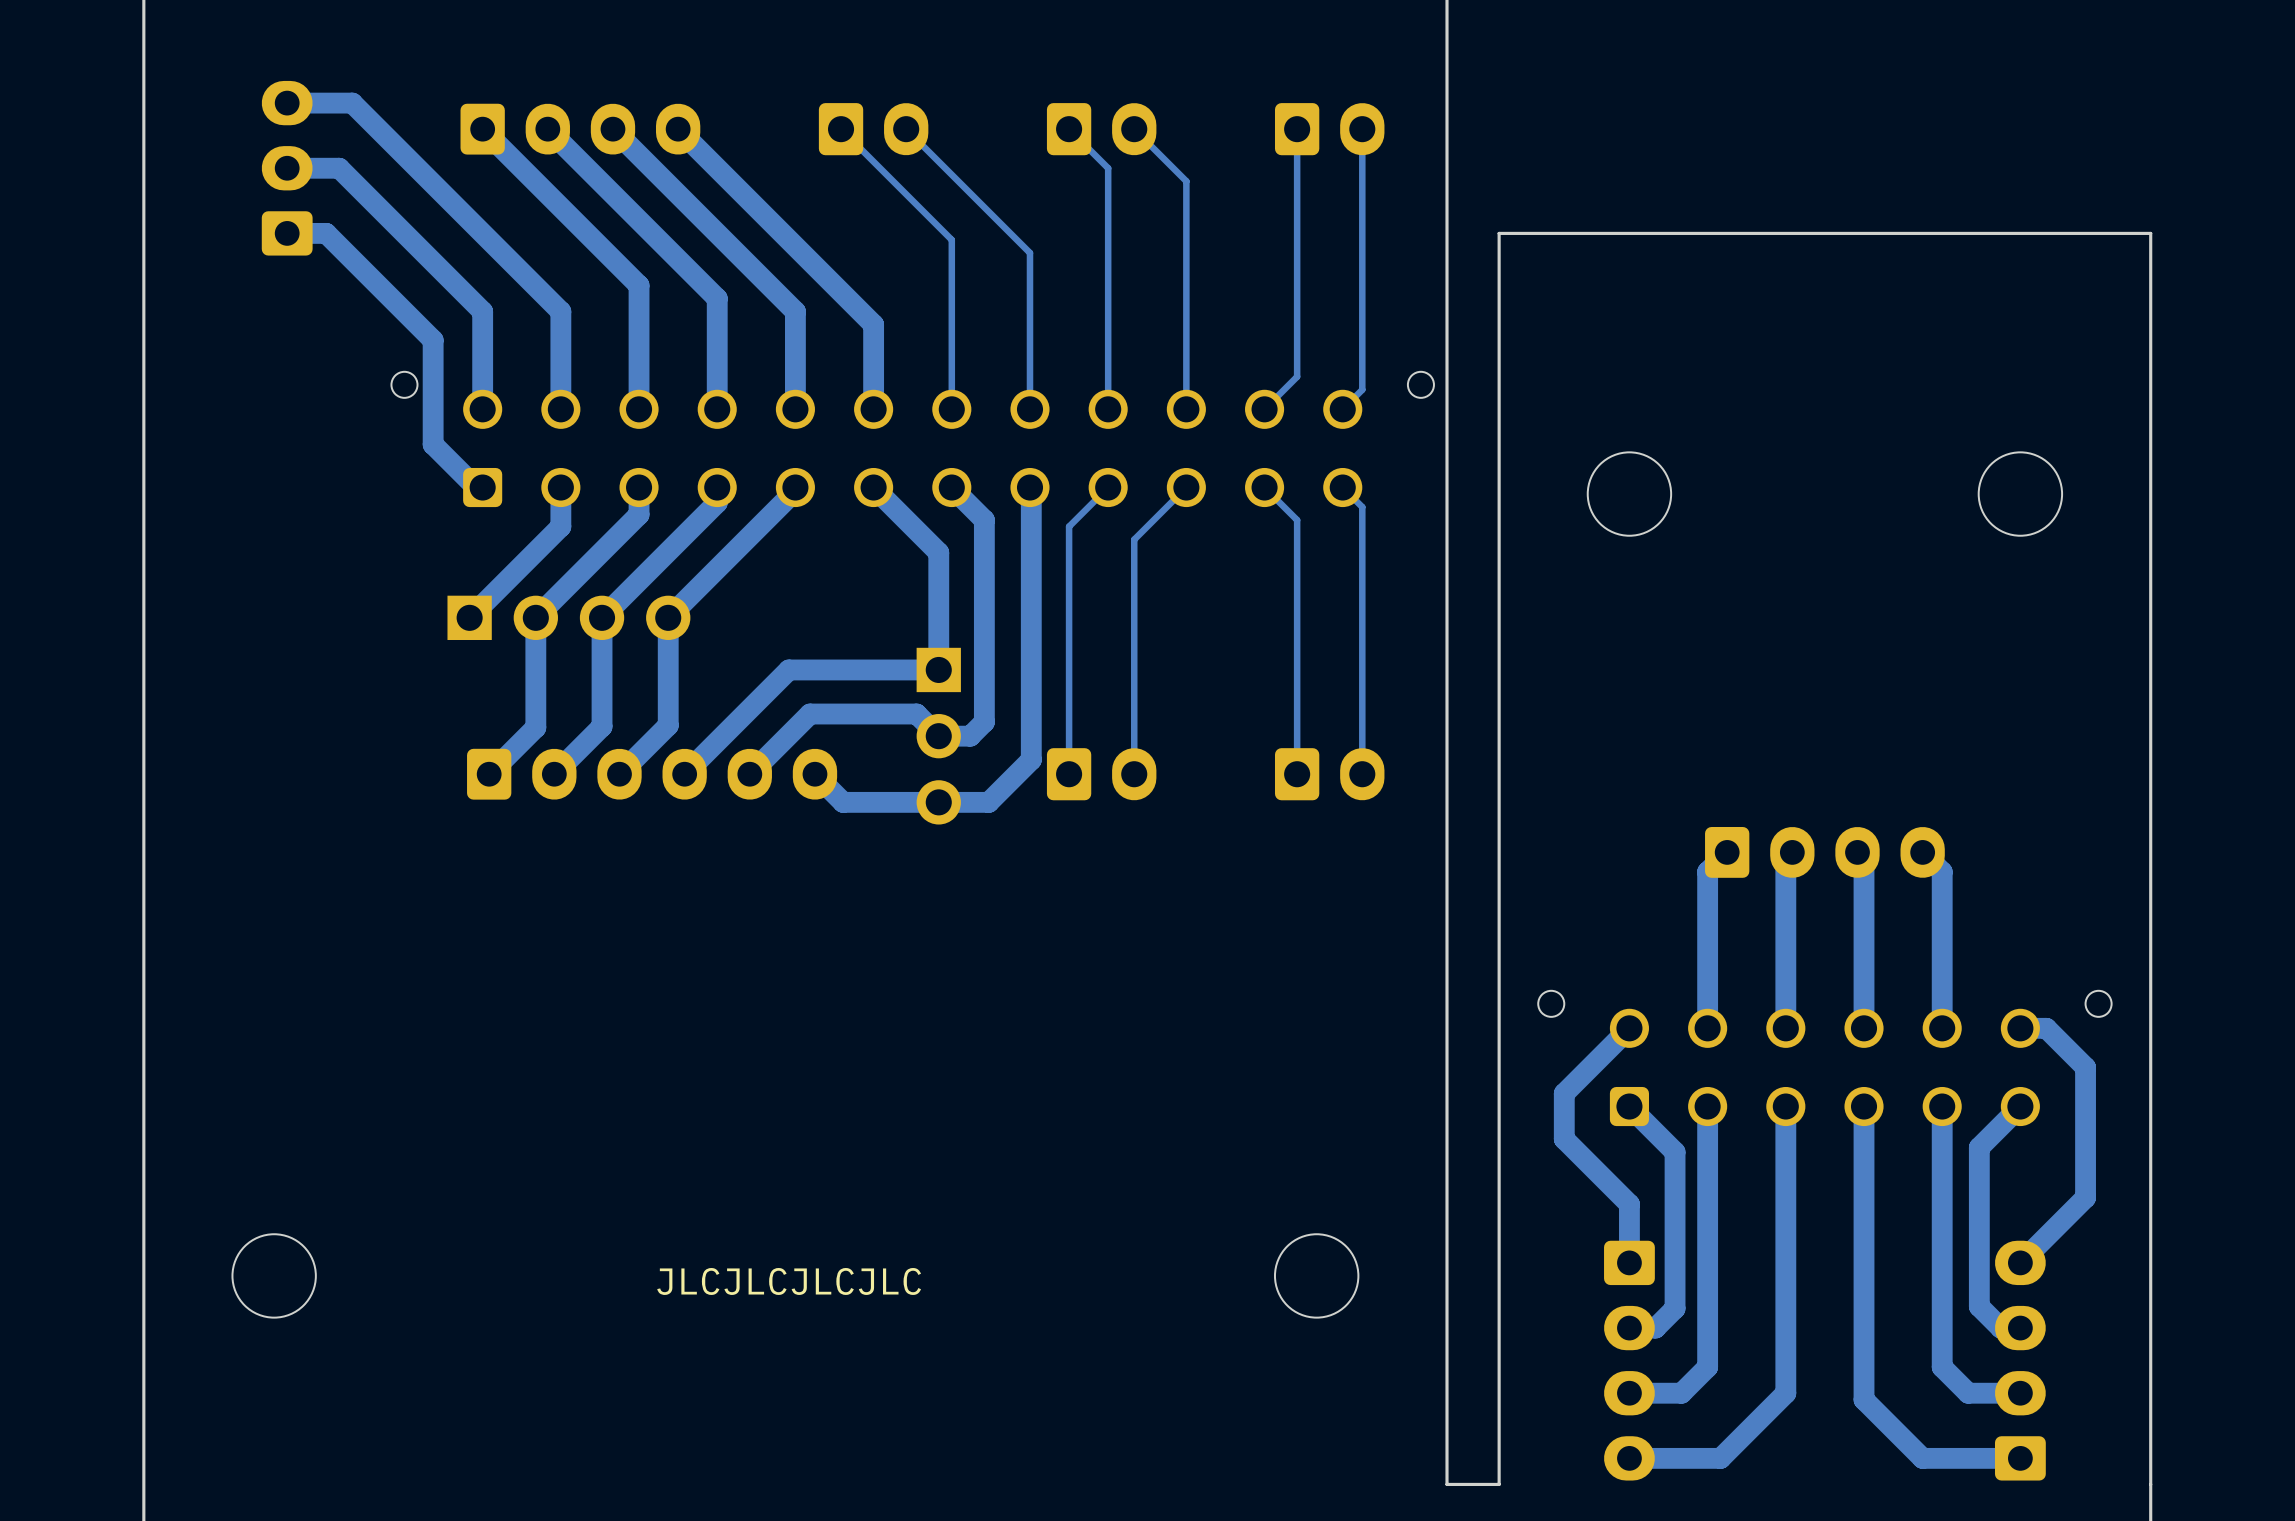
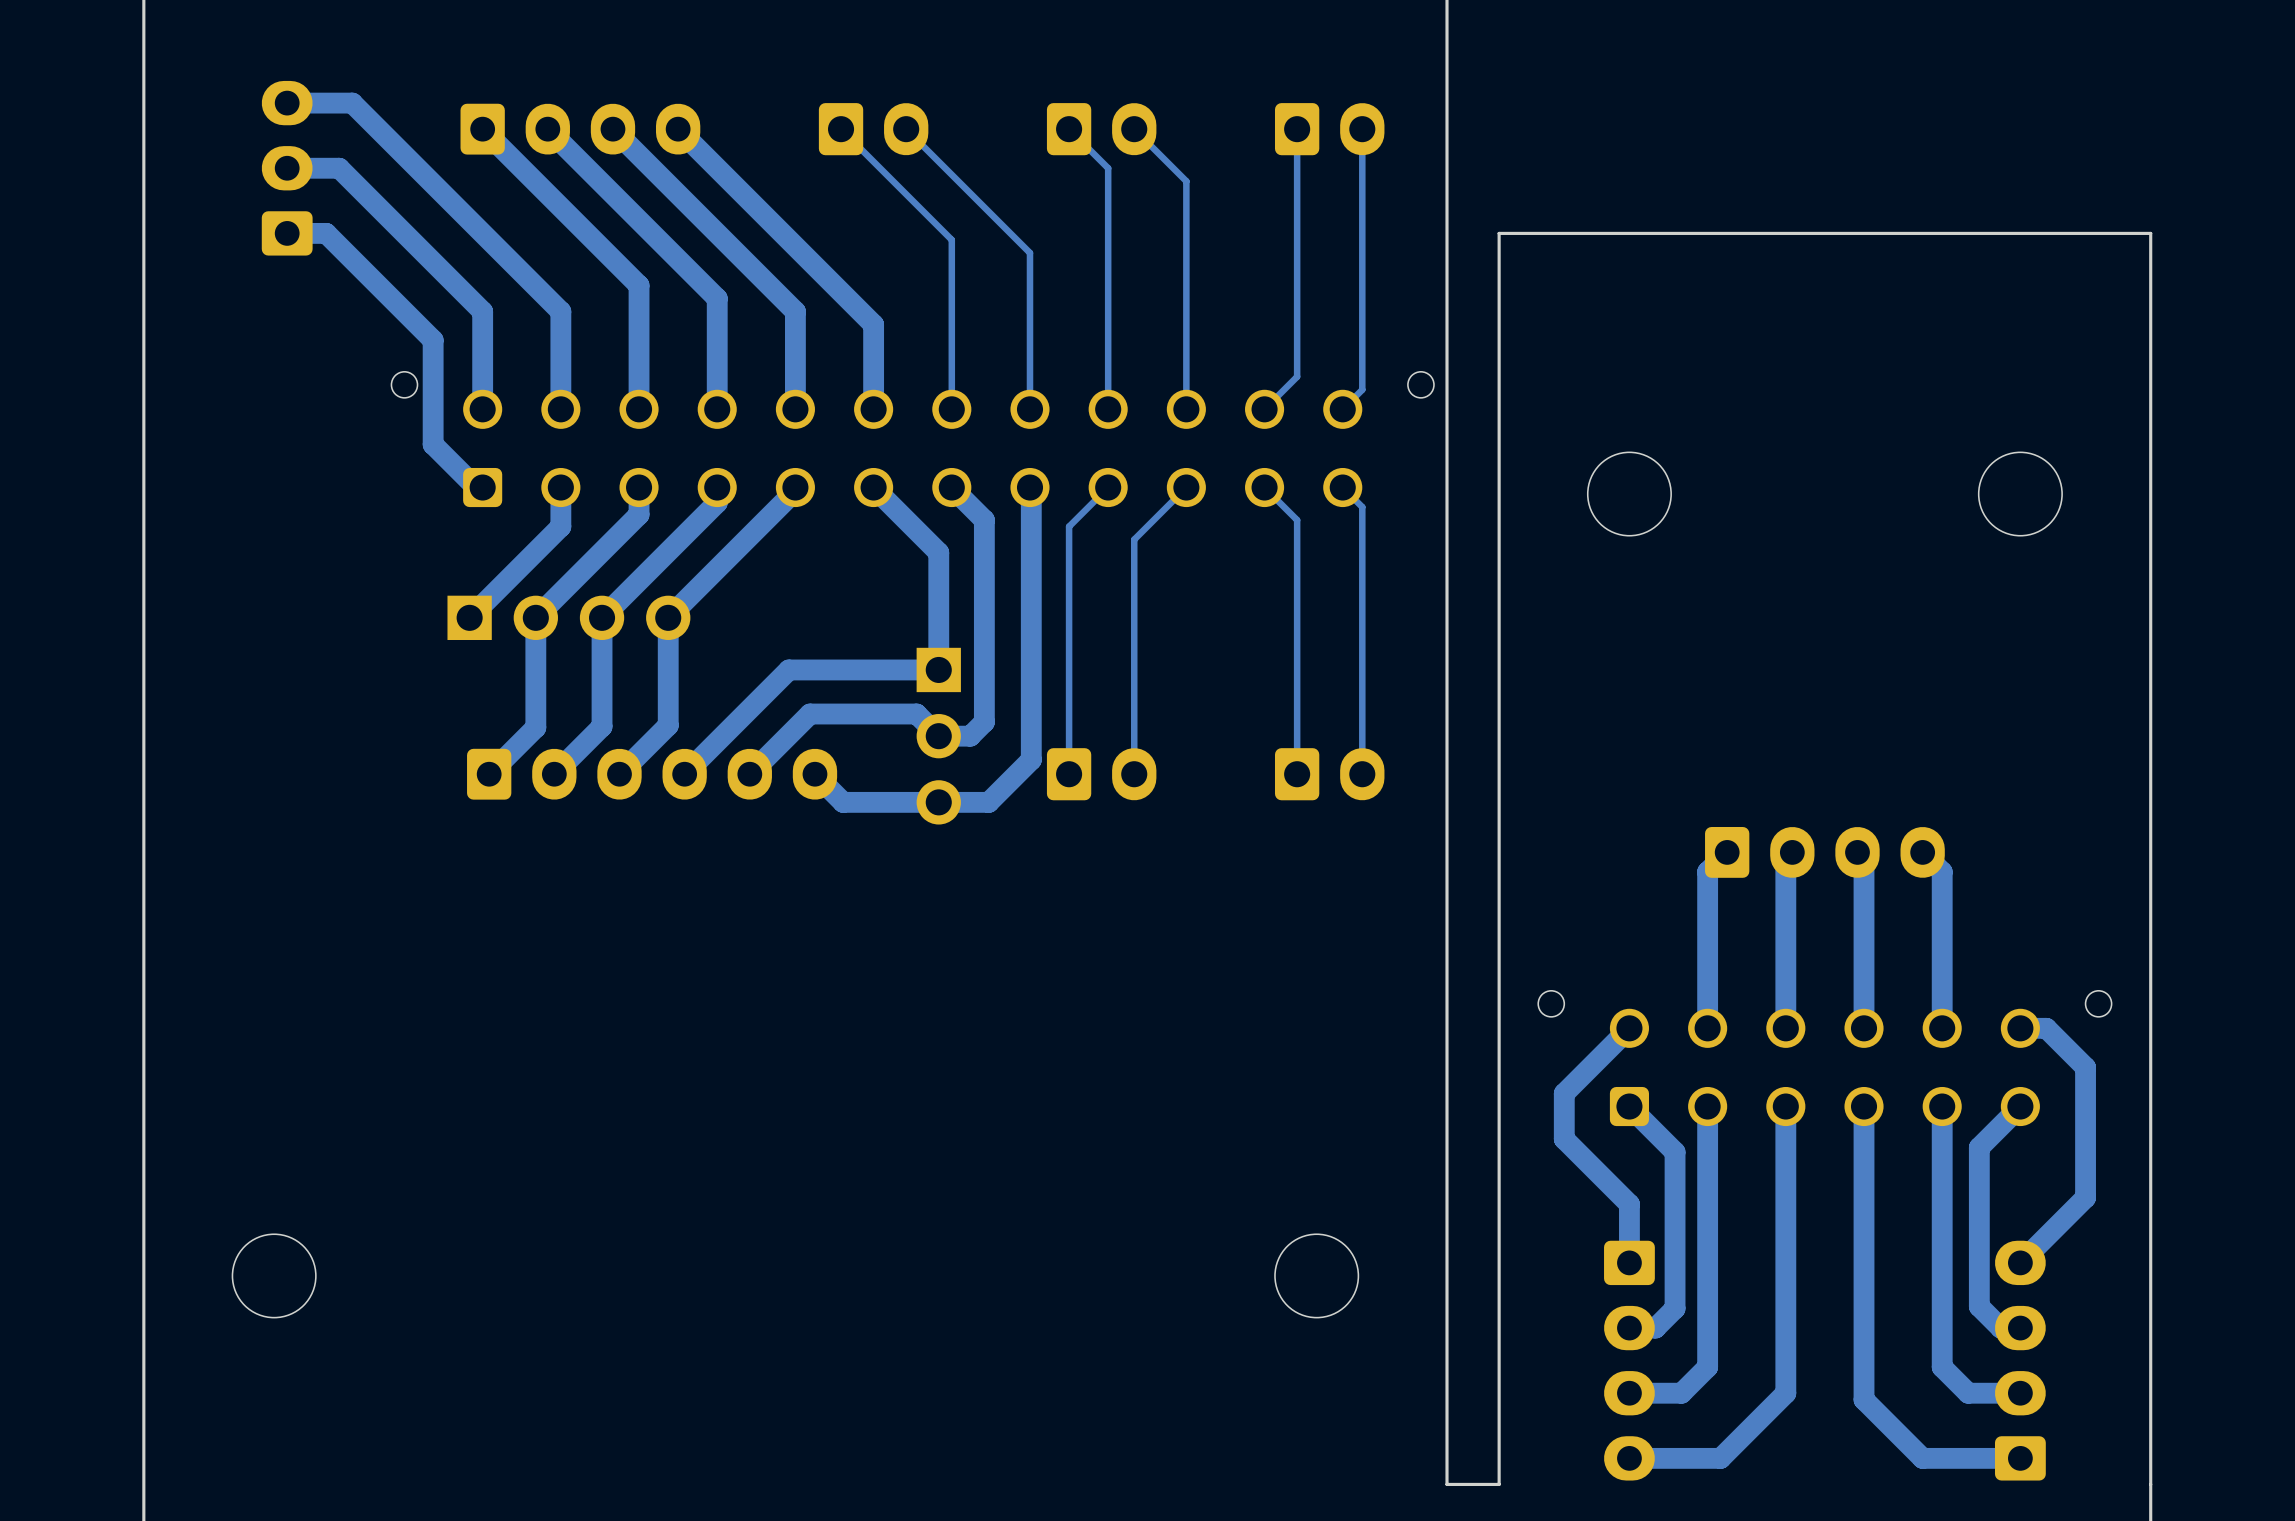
text: JLCJLCJLCJLC (789, 1281) -> none

